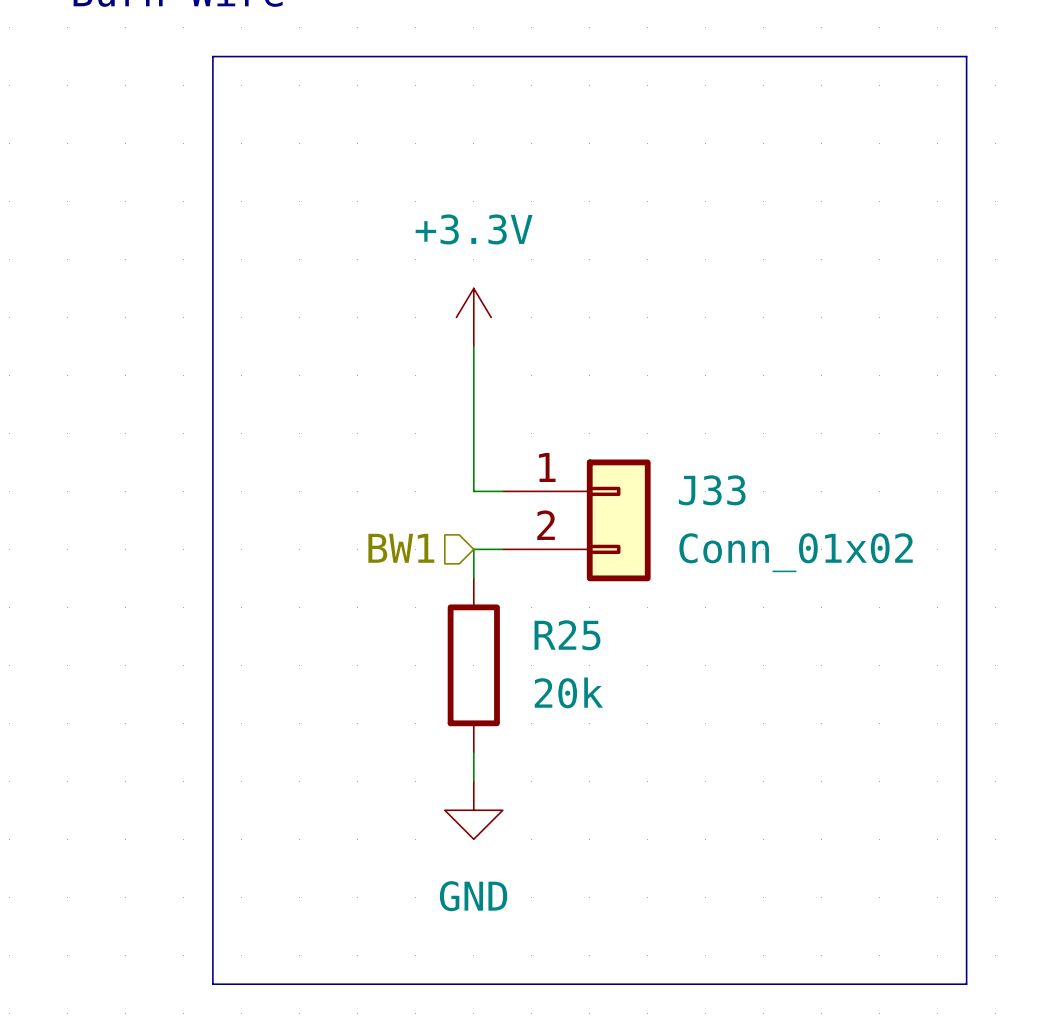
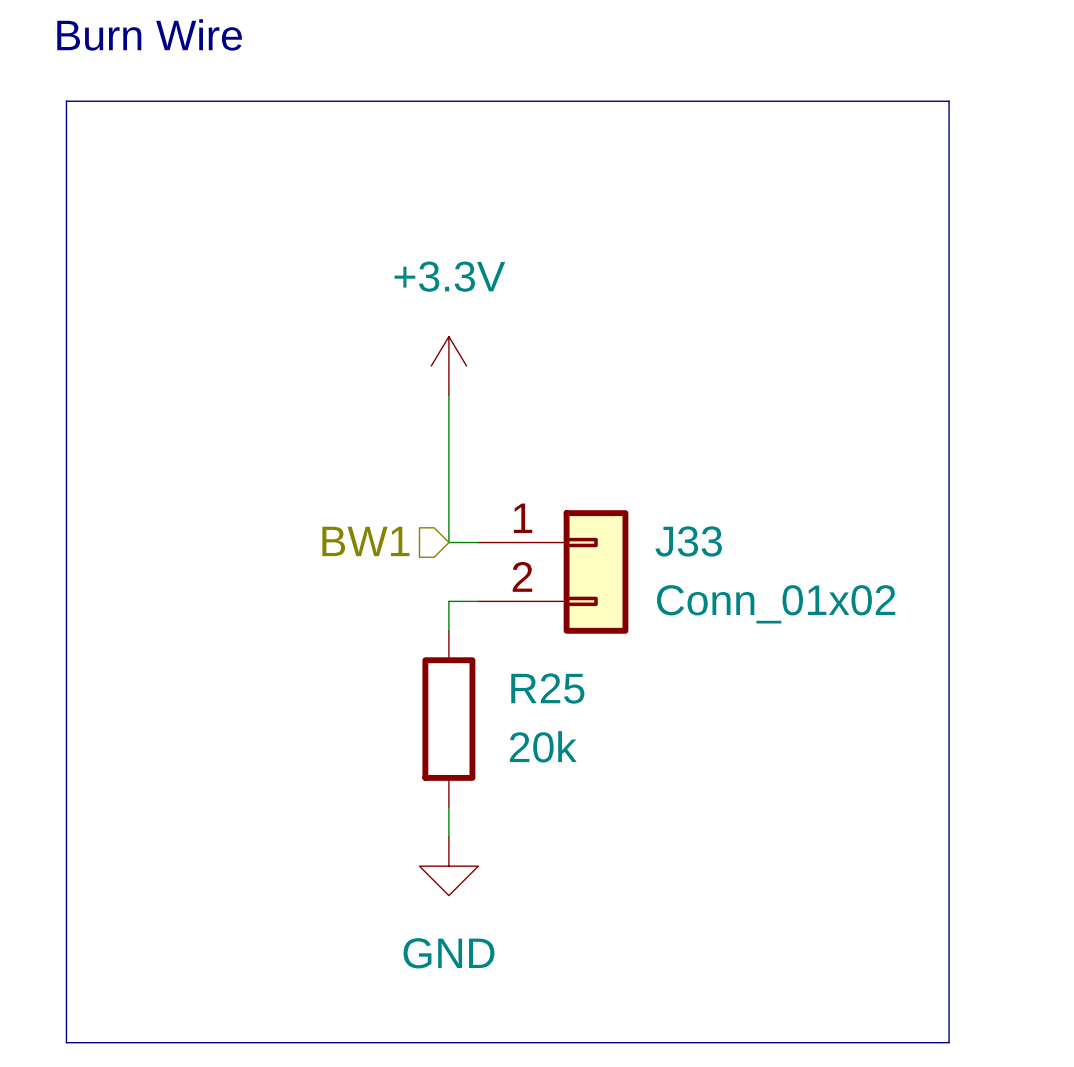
line: (212, 56) (212, 984) -> (184, 101) (66, 101) (66, 1042) (184, 1042)
hierarchical label position: BW1 (401, 548) -> BW1 (365, 541)

